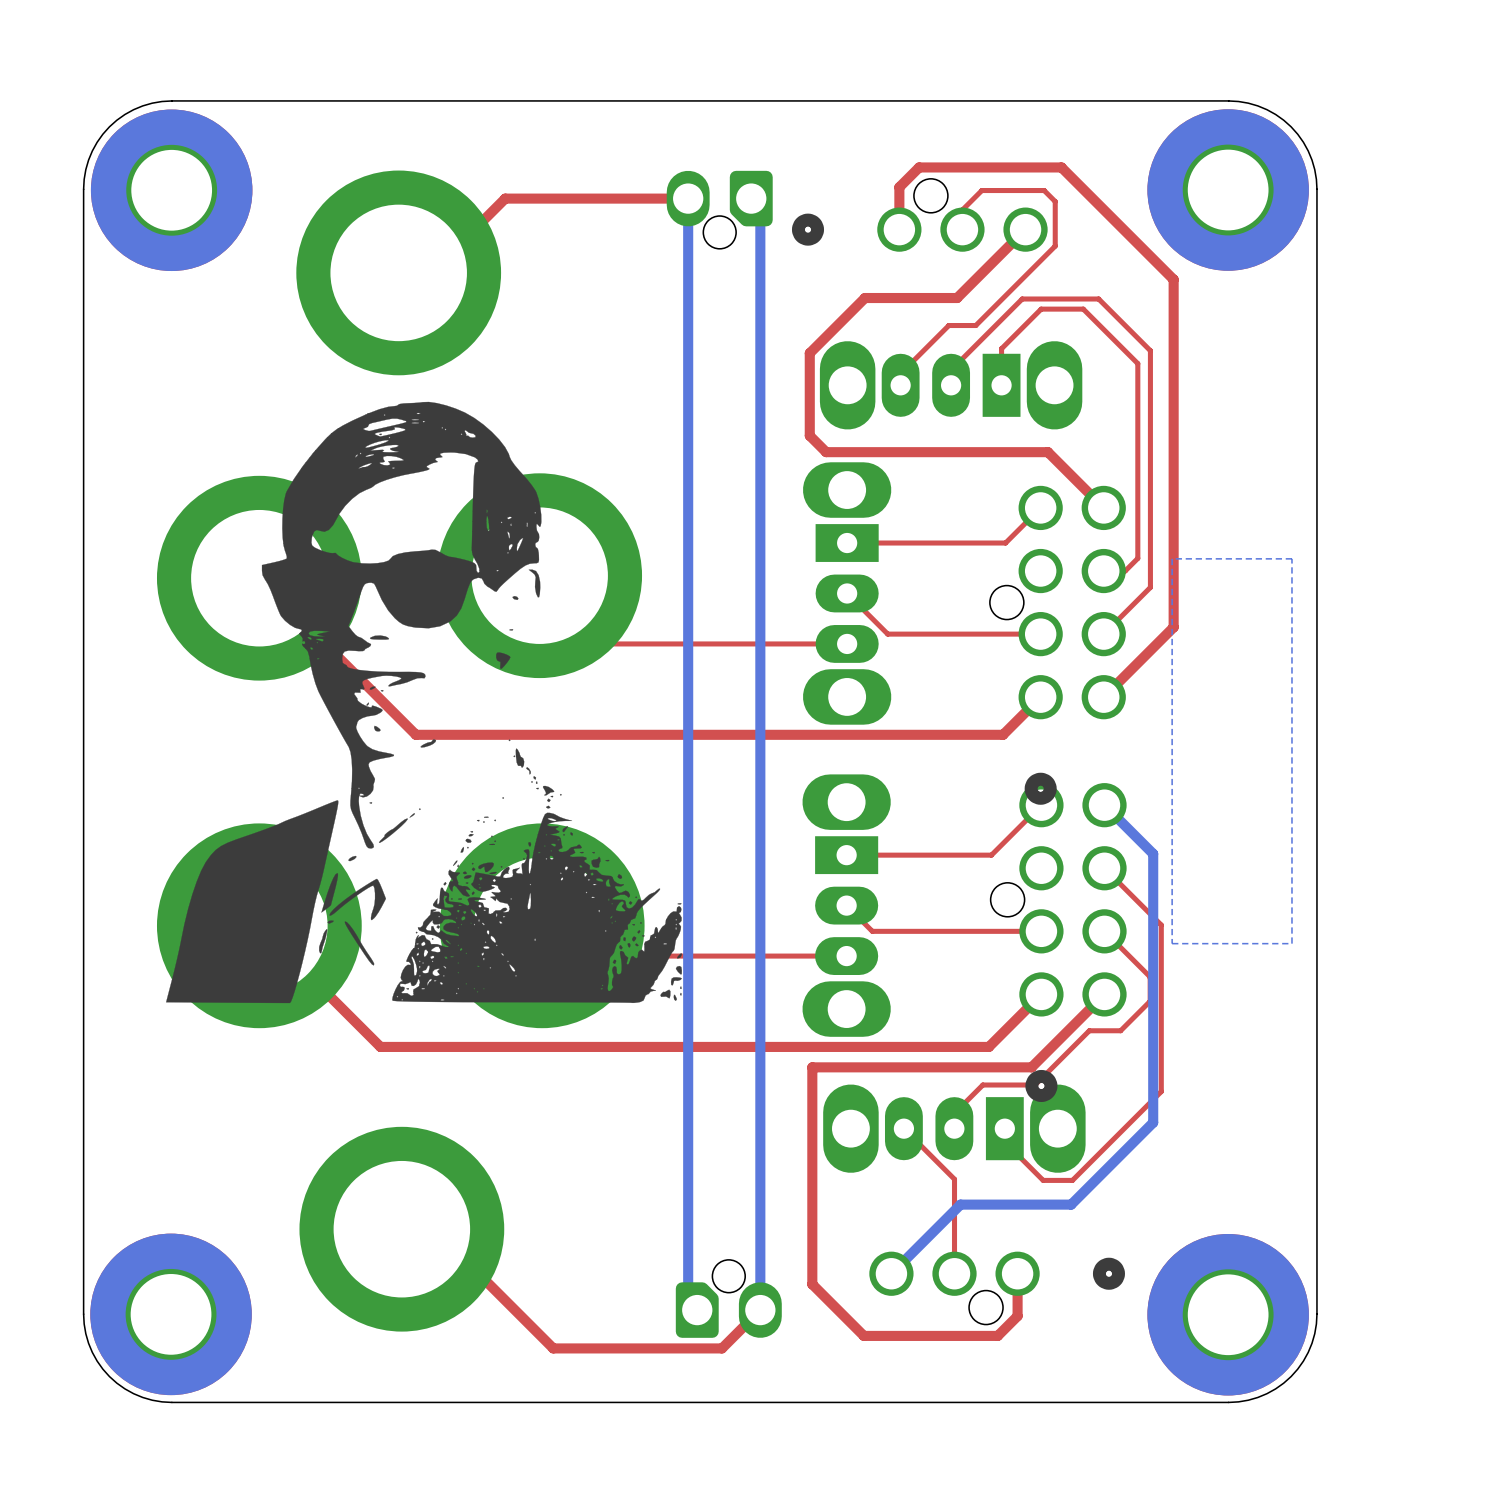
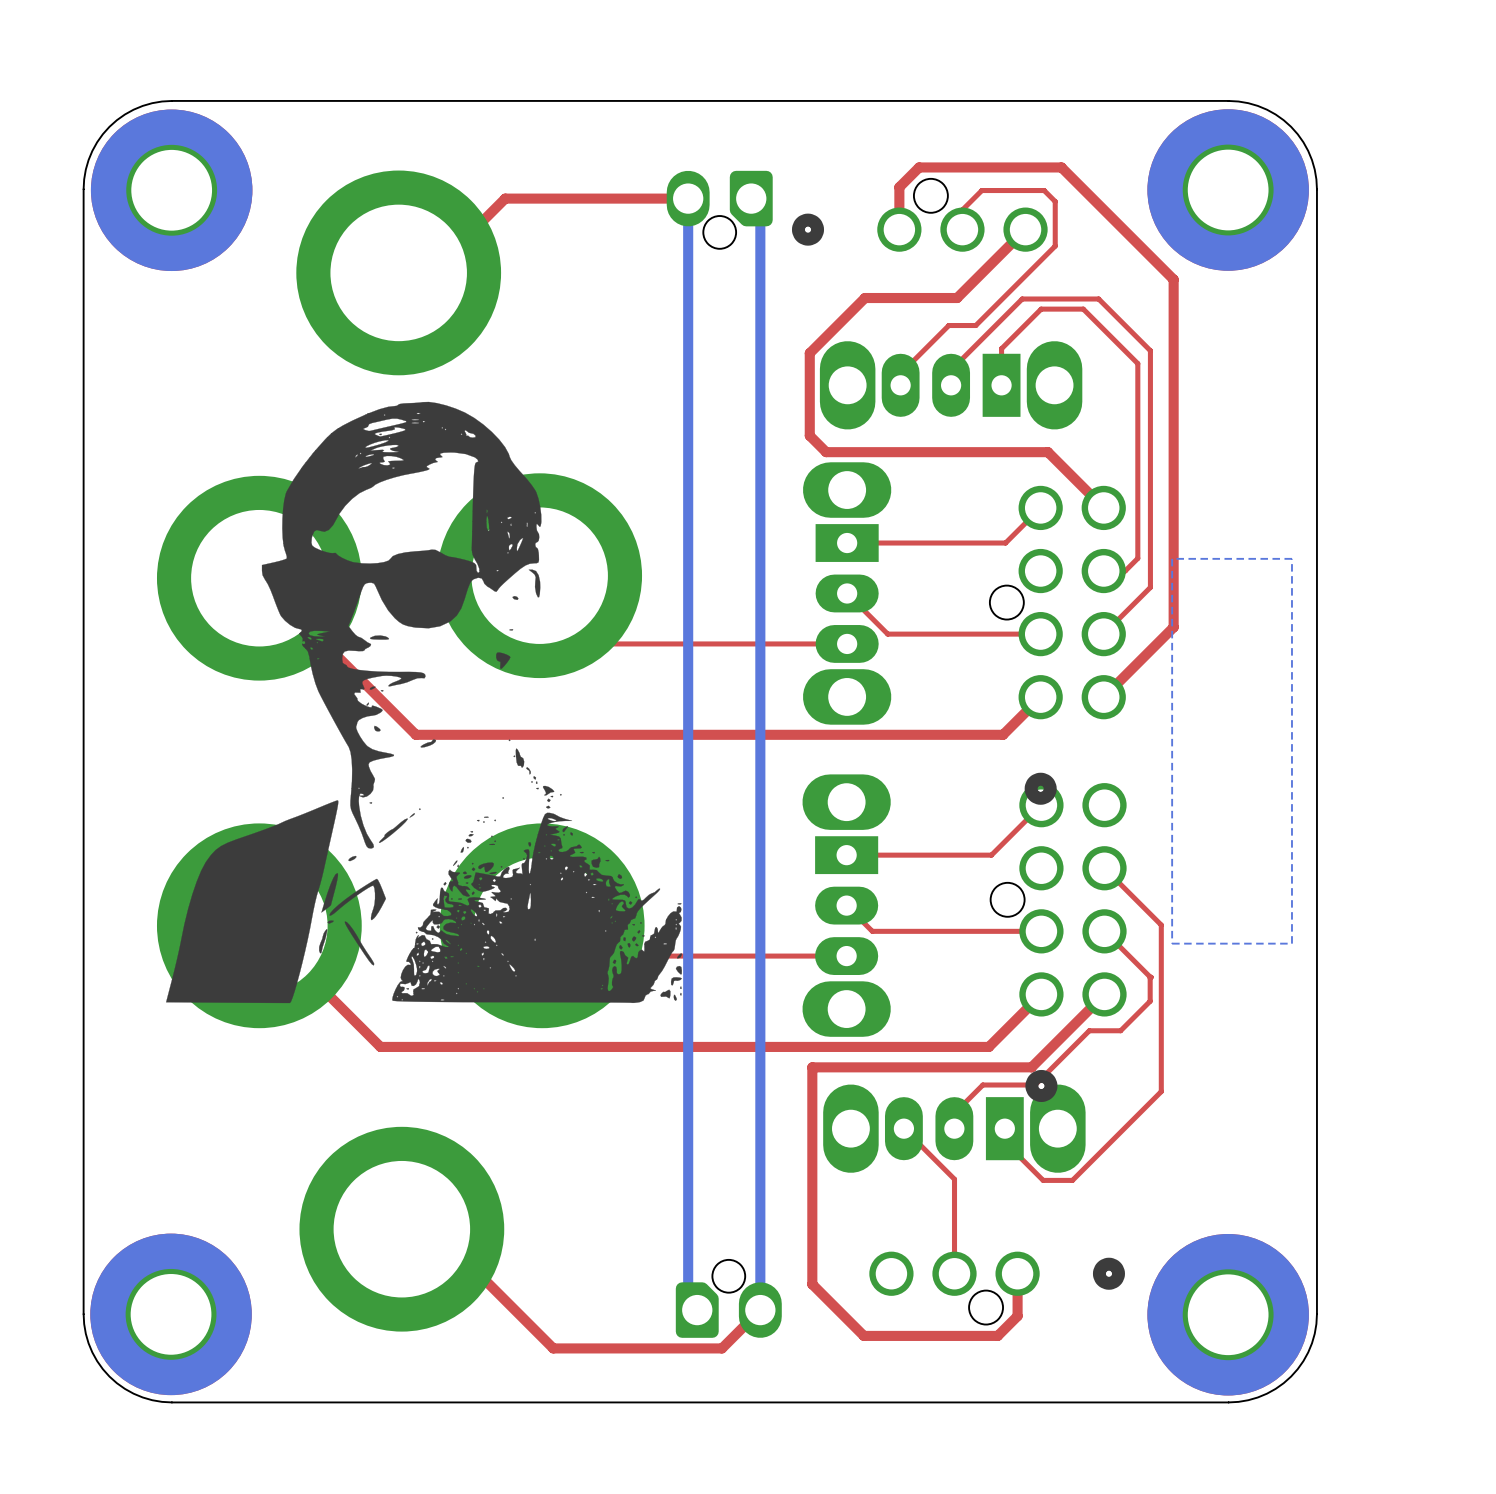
bottom track: (1104, 805) (1153, 853) (1153, 1122) (1071, 1204) (960, 1204) (891, 1273) -> none

